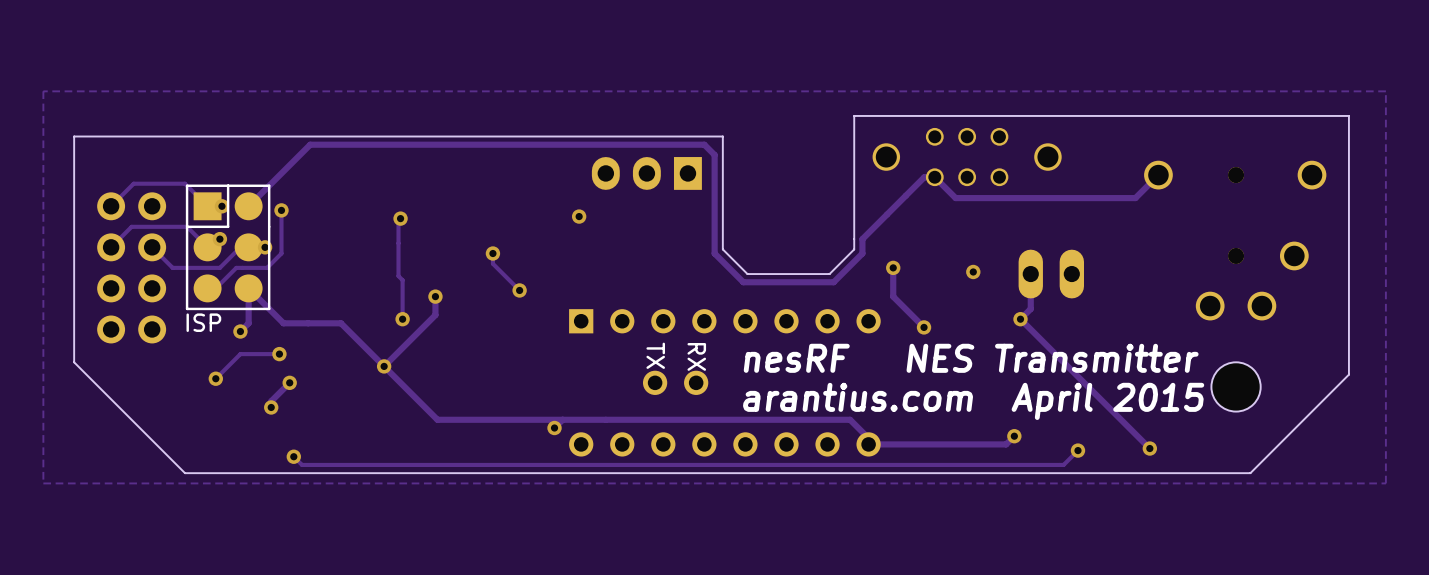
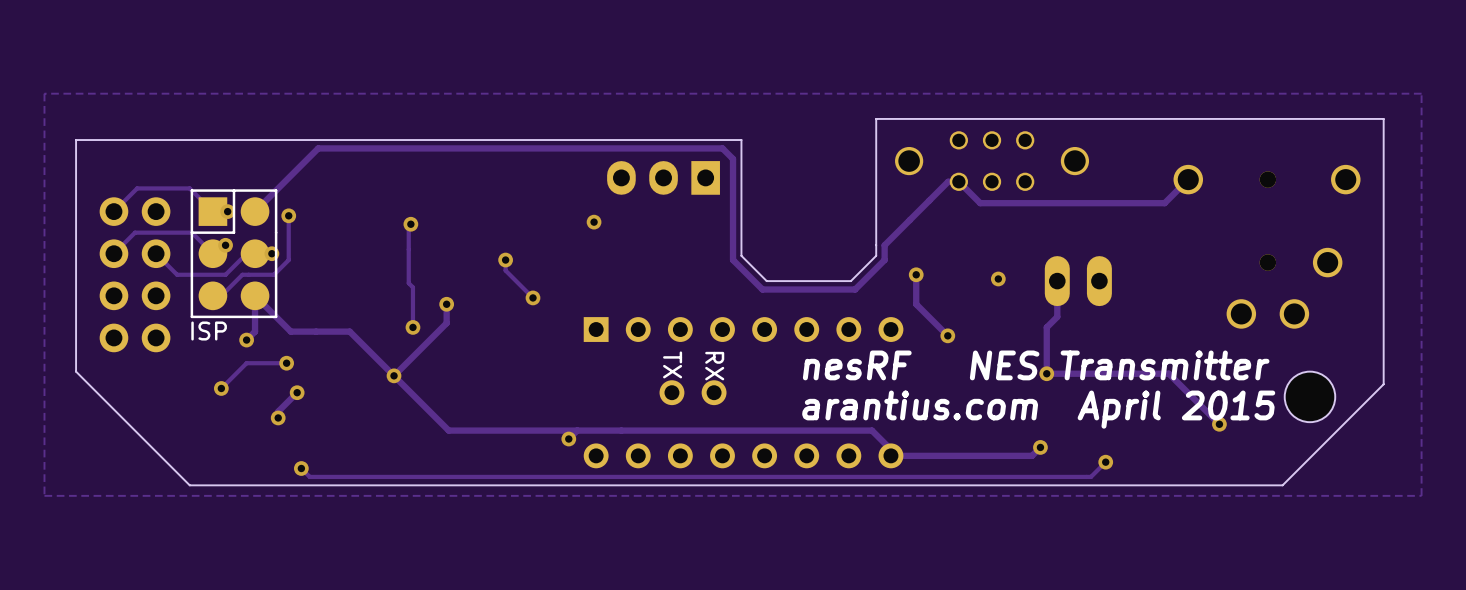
track: (1020, 319) (1149, 448) -> (1046, 327) (1046, 373) (1168, 373) (1219, 424)
via position: (1020, 319) -> (1046, 373)
text position: nesRF NES Transmitter (971, 358) -> nesRF NES Transmitter (1036, 365)
part position: (1236, 386) -> (1309, 396)
text position: arantius.com April 2015 (973, 401) -> arantius.com April 2015 (1038, 409)
via position: (1149, 448) -> (1219, 424)

